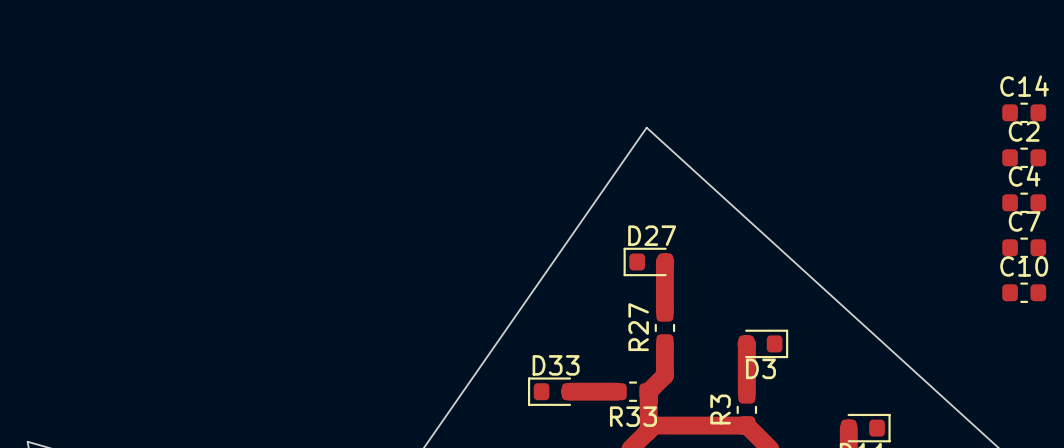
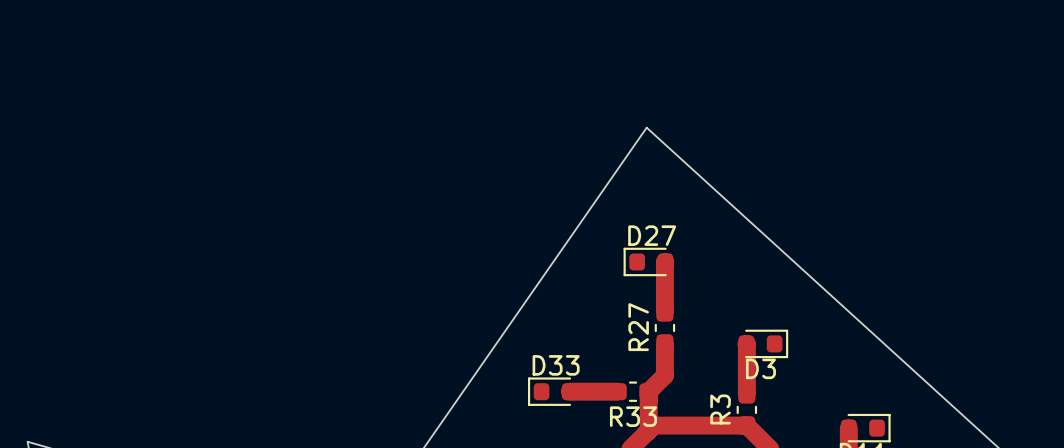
C14: (1024, 112) -> none
C2: (1024, 157) -> none
C4: (1024, 202) -> none
C7: (1024, 247) -> none
C10: (1024, 292) -> none

